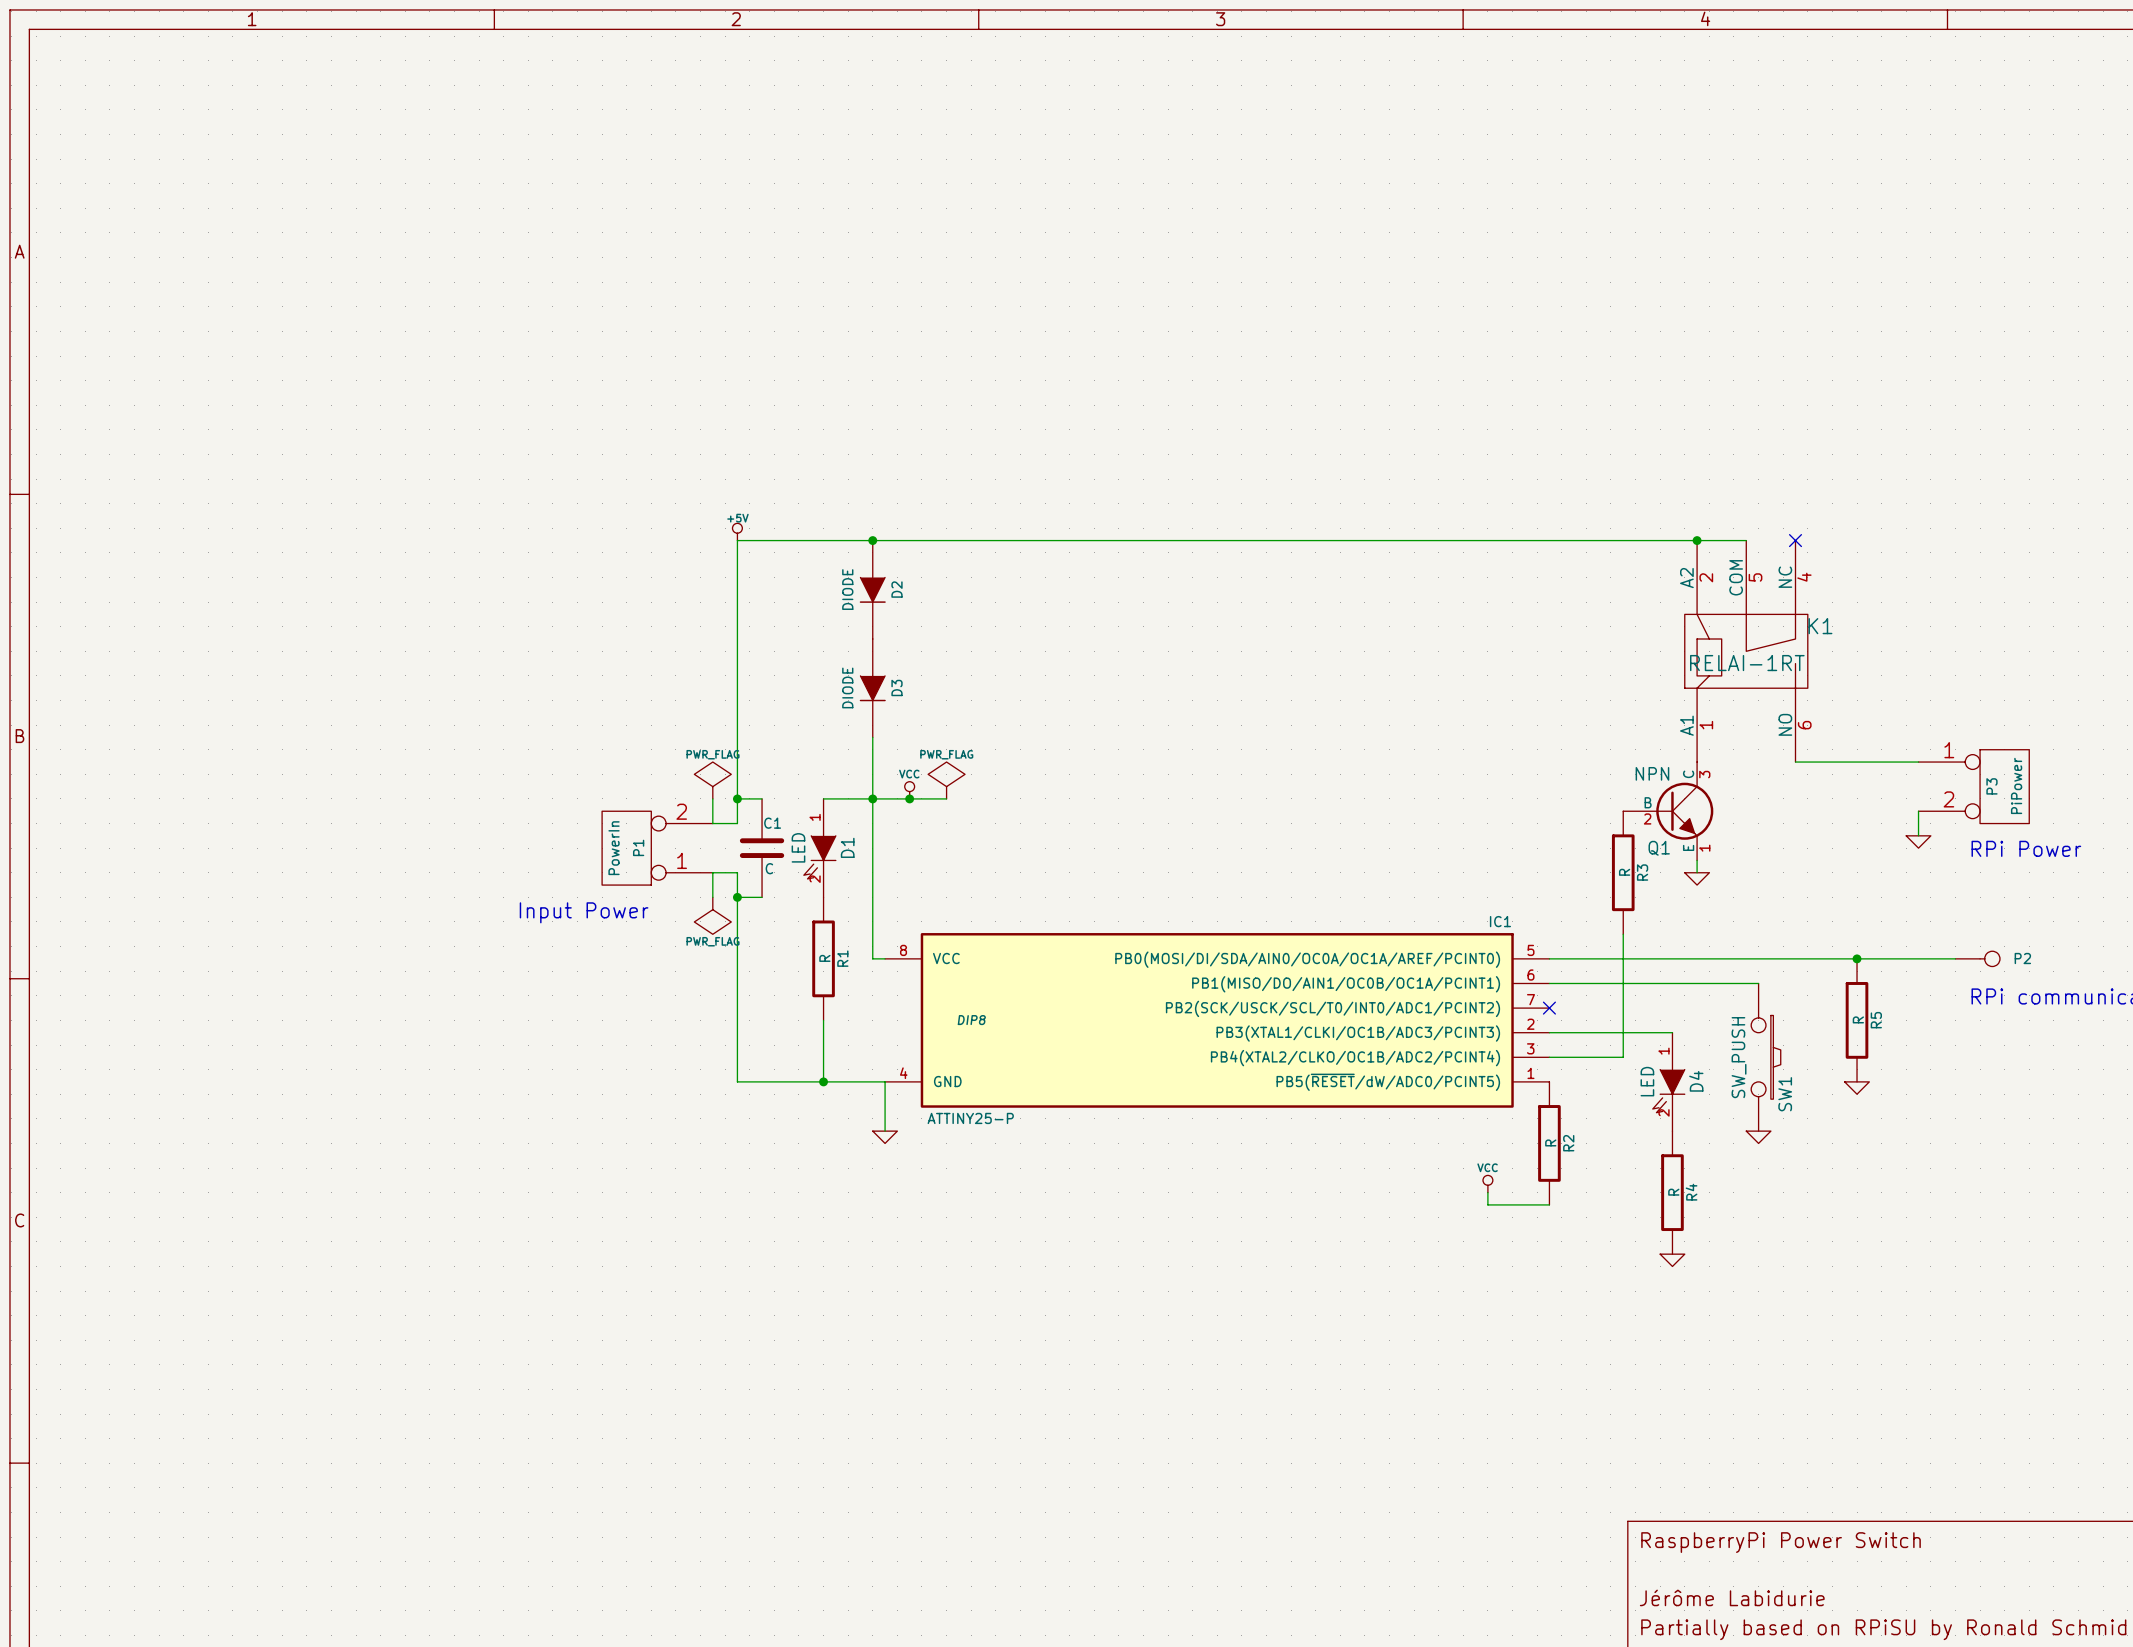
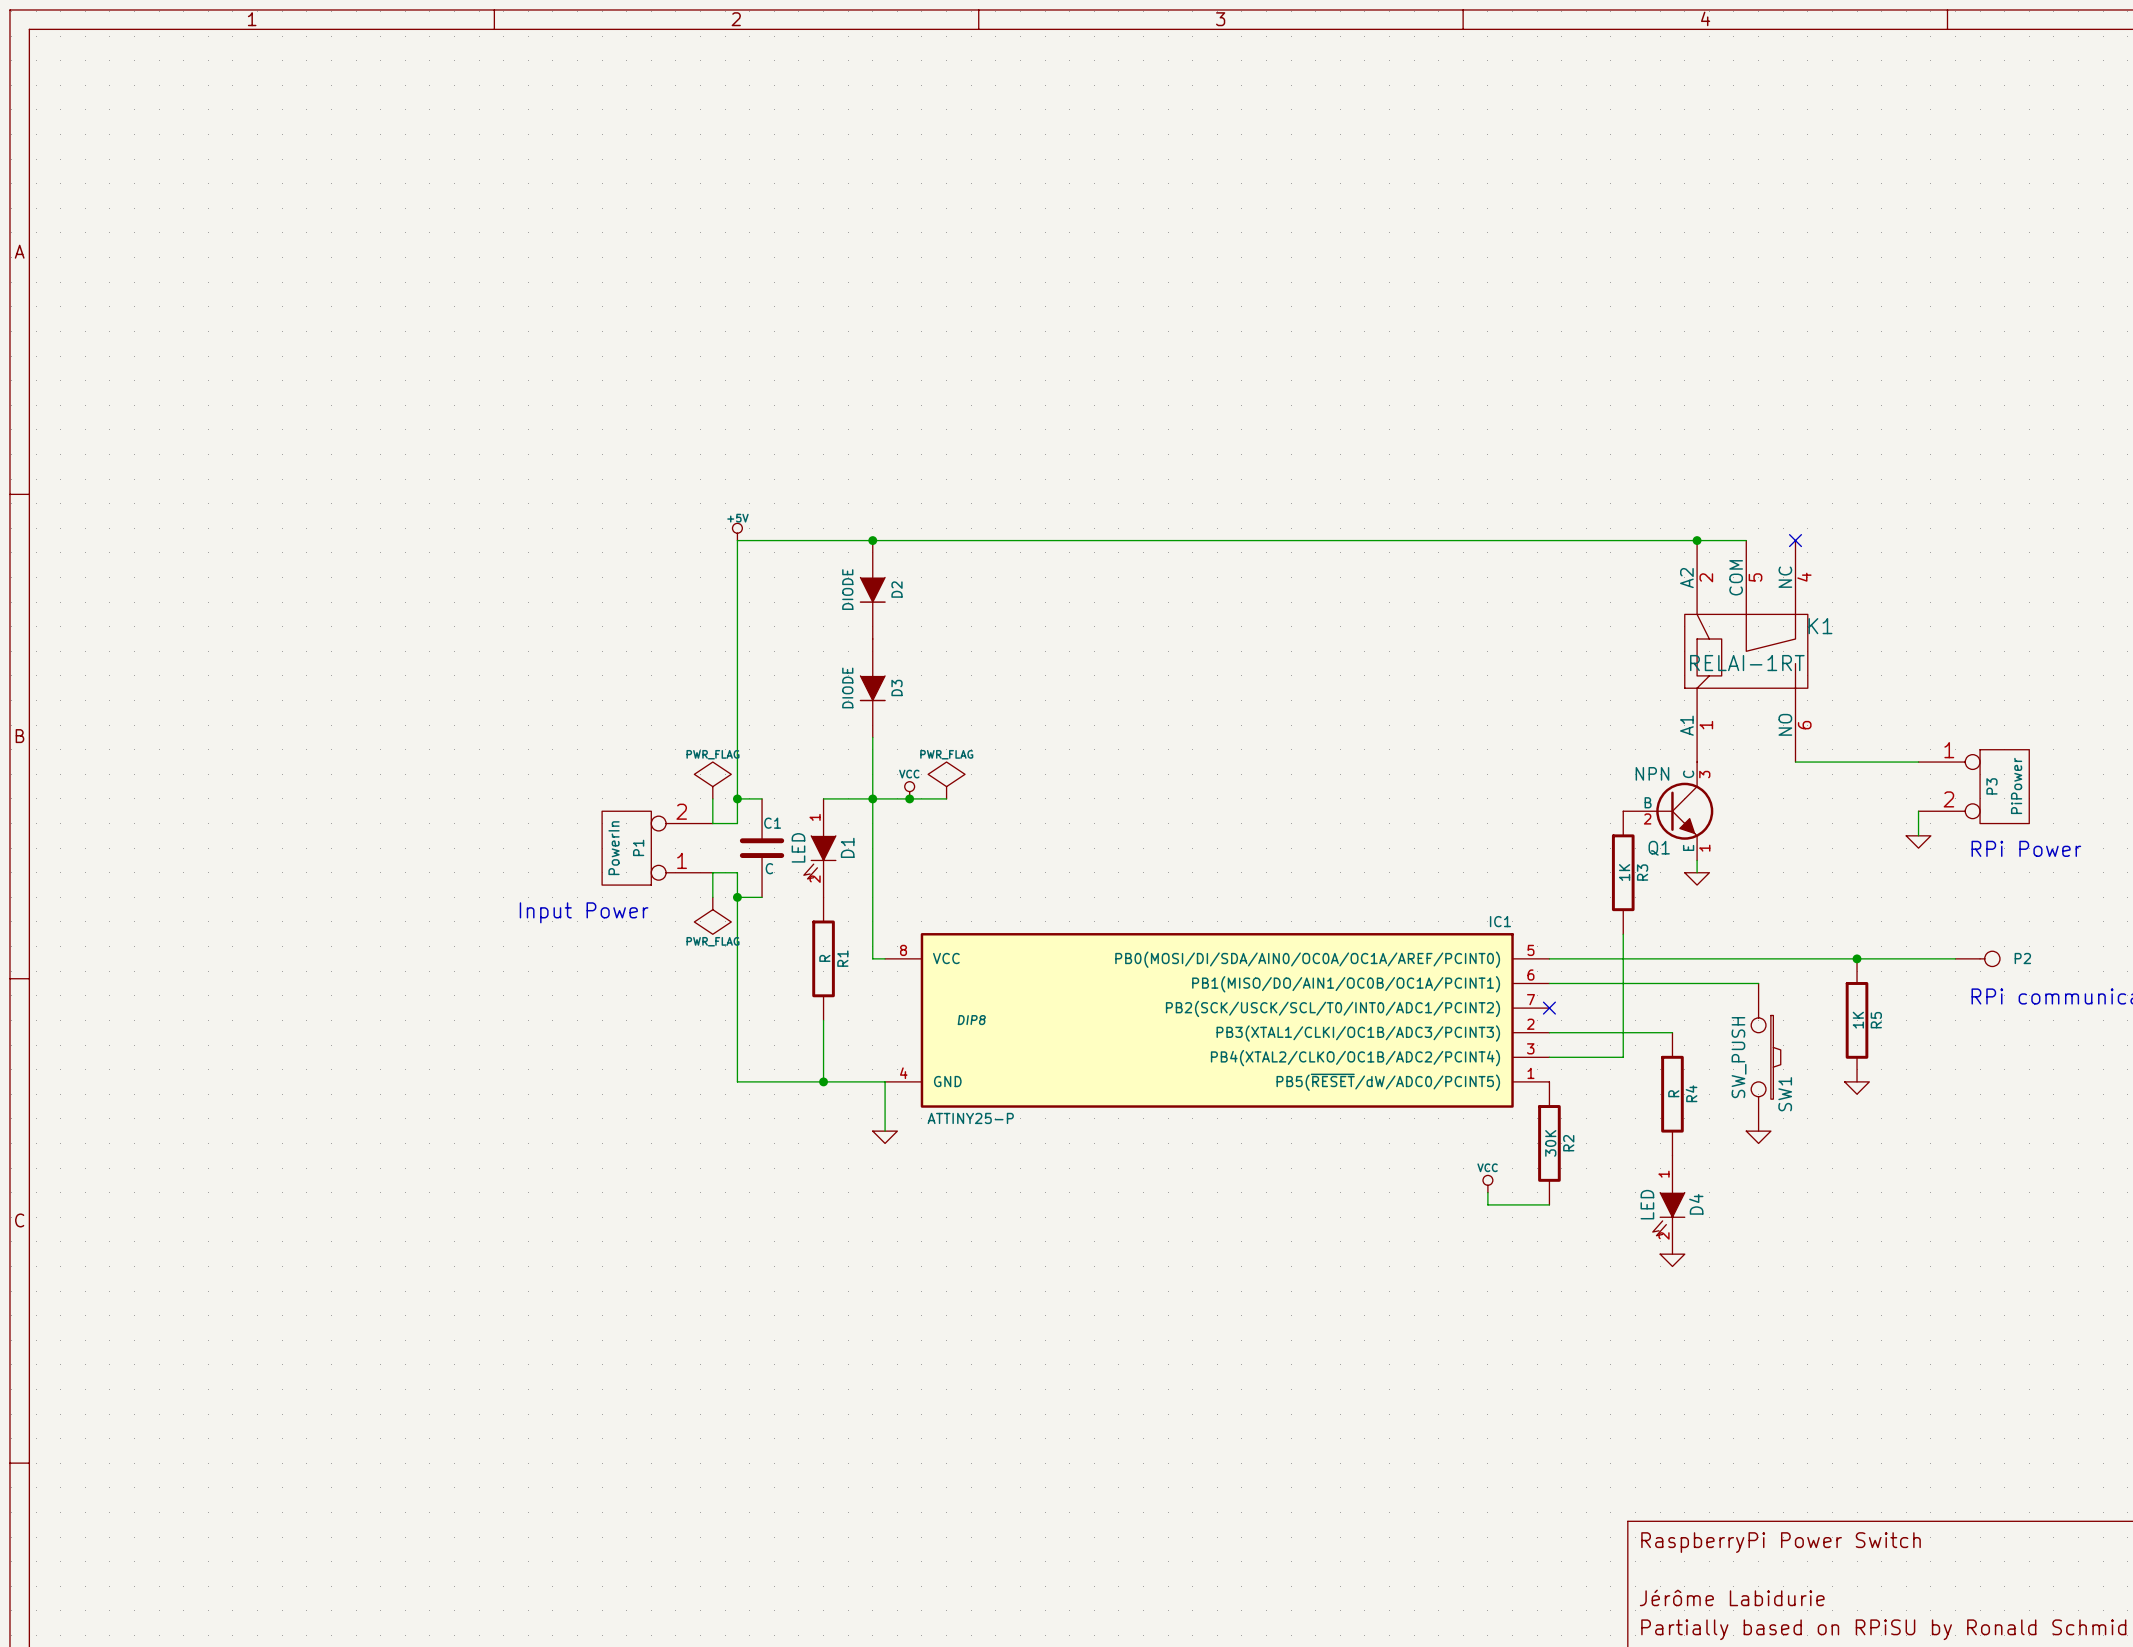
R3 value: R (1624, 872) -> 1K (1624, 872)
R5 value: R (1858, 1019) -> 1K (1858, 1020)
D4 position: (1668, 1081) -> (1668, 1204)
R2 value: R (1550, 1142) -> 30K (1550, 1143)
R4 position: (1672, 1192) -> (1672, 1094)

